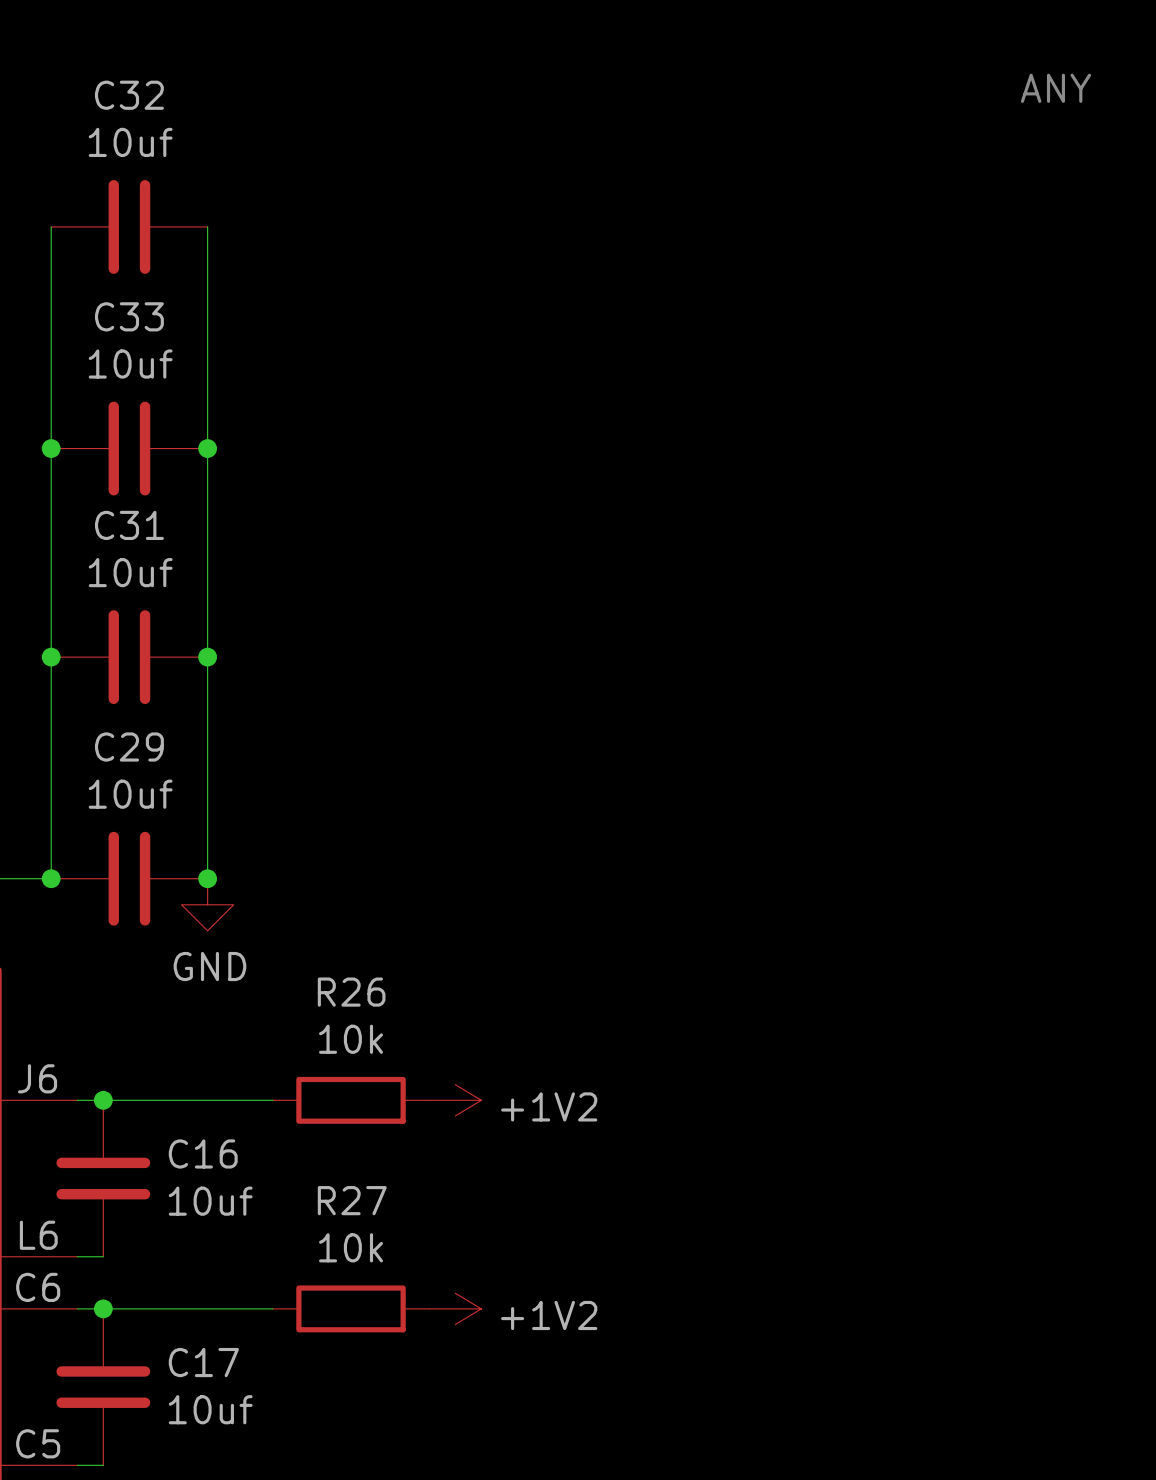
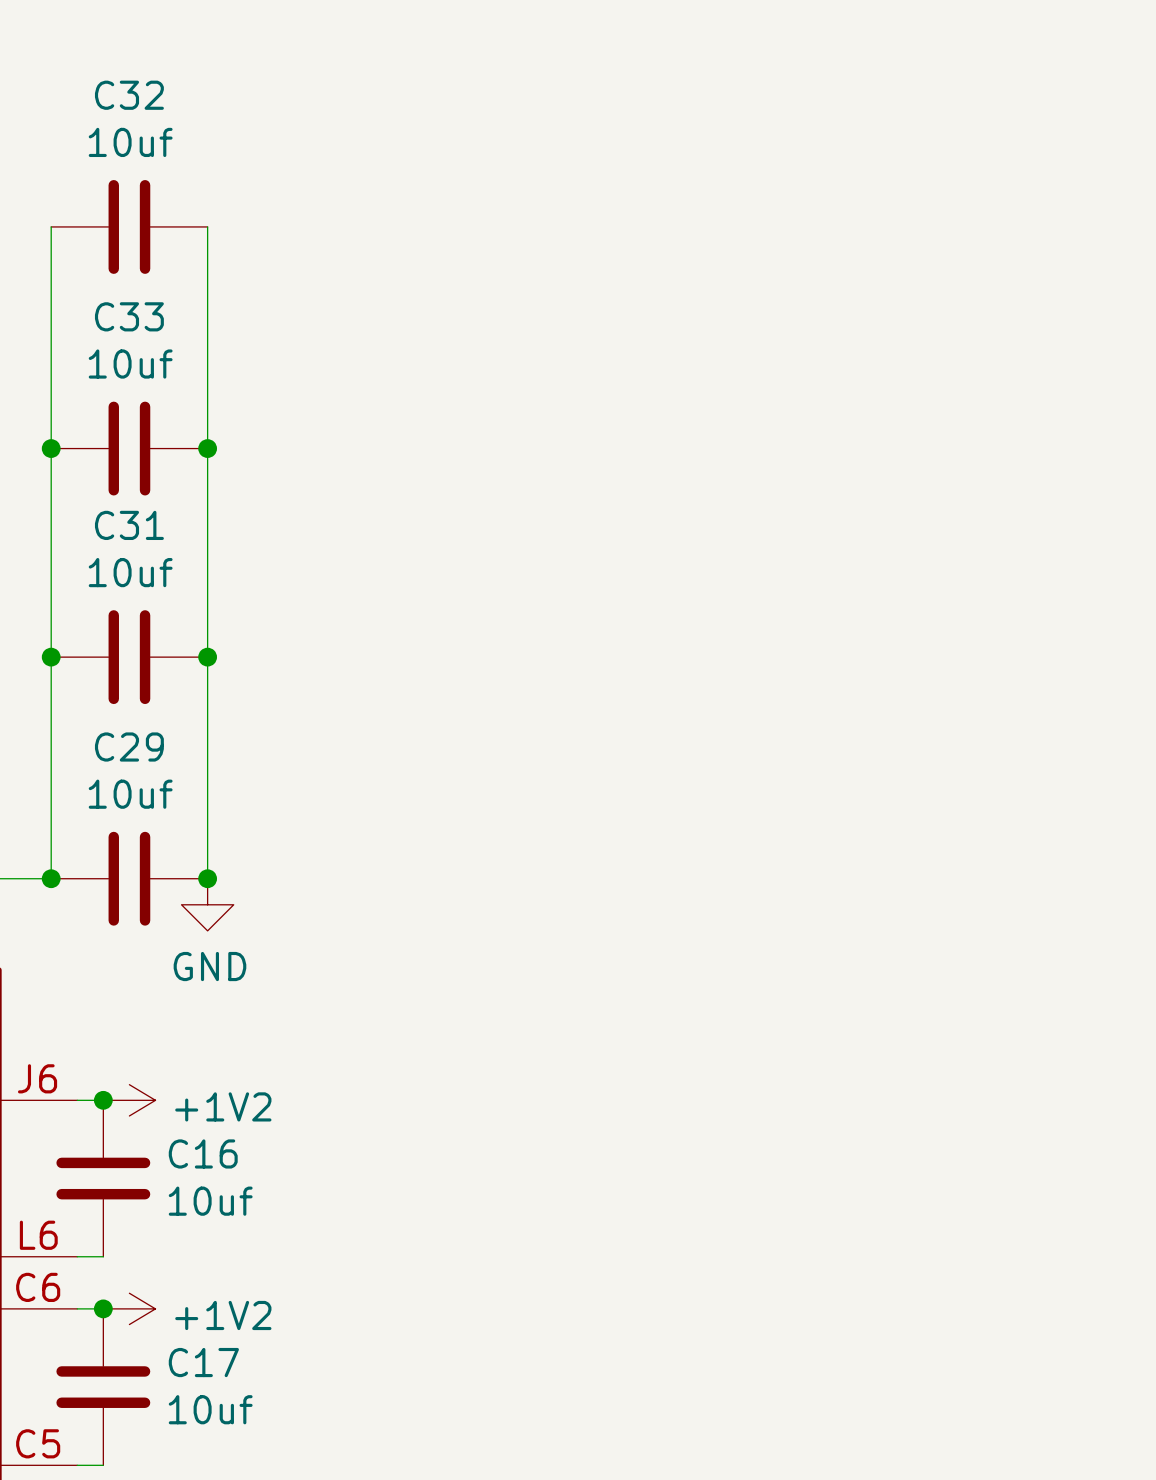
text: ANY (1055, 88) -> none
wire: (103, 1100) (272, 1100) -> none
power symbol: none -> +1V2 (129, 1100)
R26: 10k (351, 1100) -> none
power symbol: +1V2 (455, 1100) -> none
wire: (103, 1308) (272, 1308) -> none
power symbol: none -> +1V2 (129, 1308)
R27: 10k (351, 1308) -> none
power symbol: +1V2 (455, 1308) -> none

